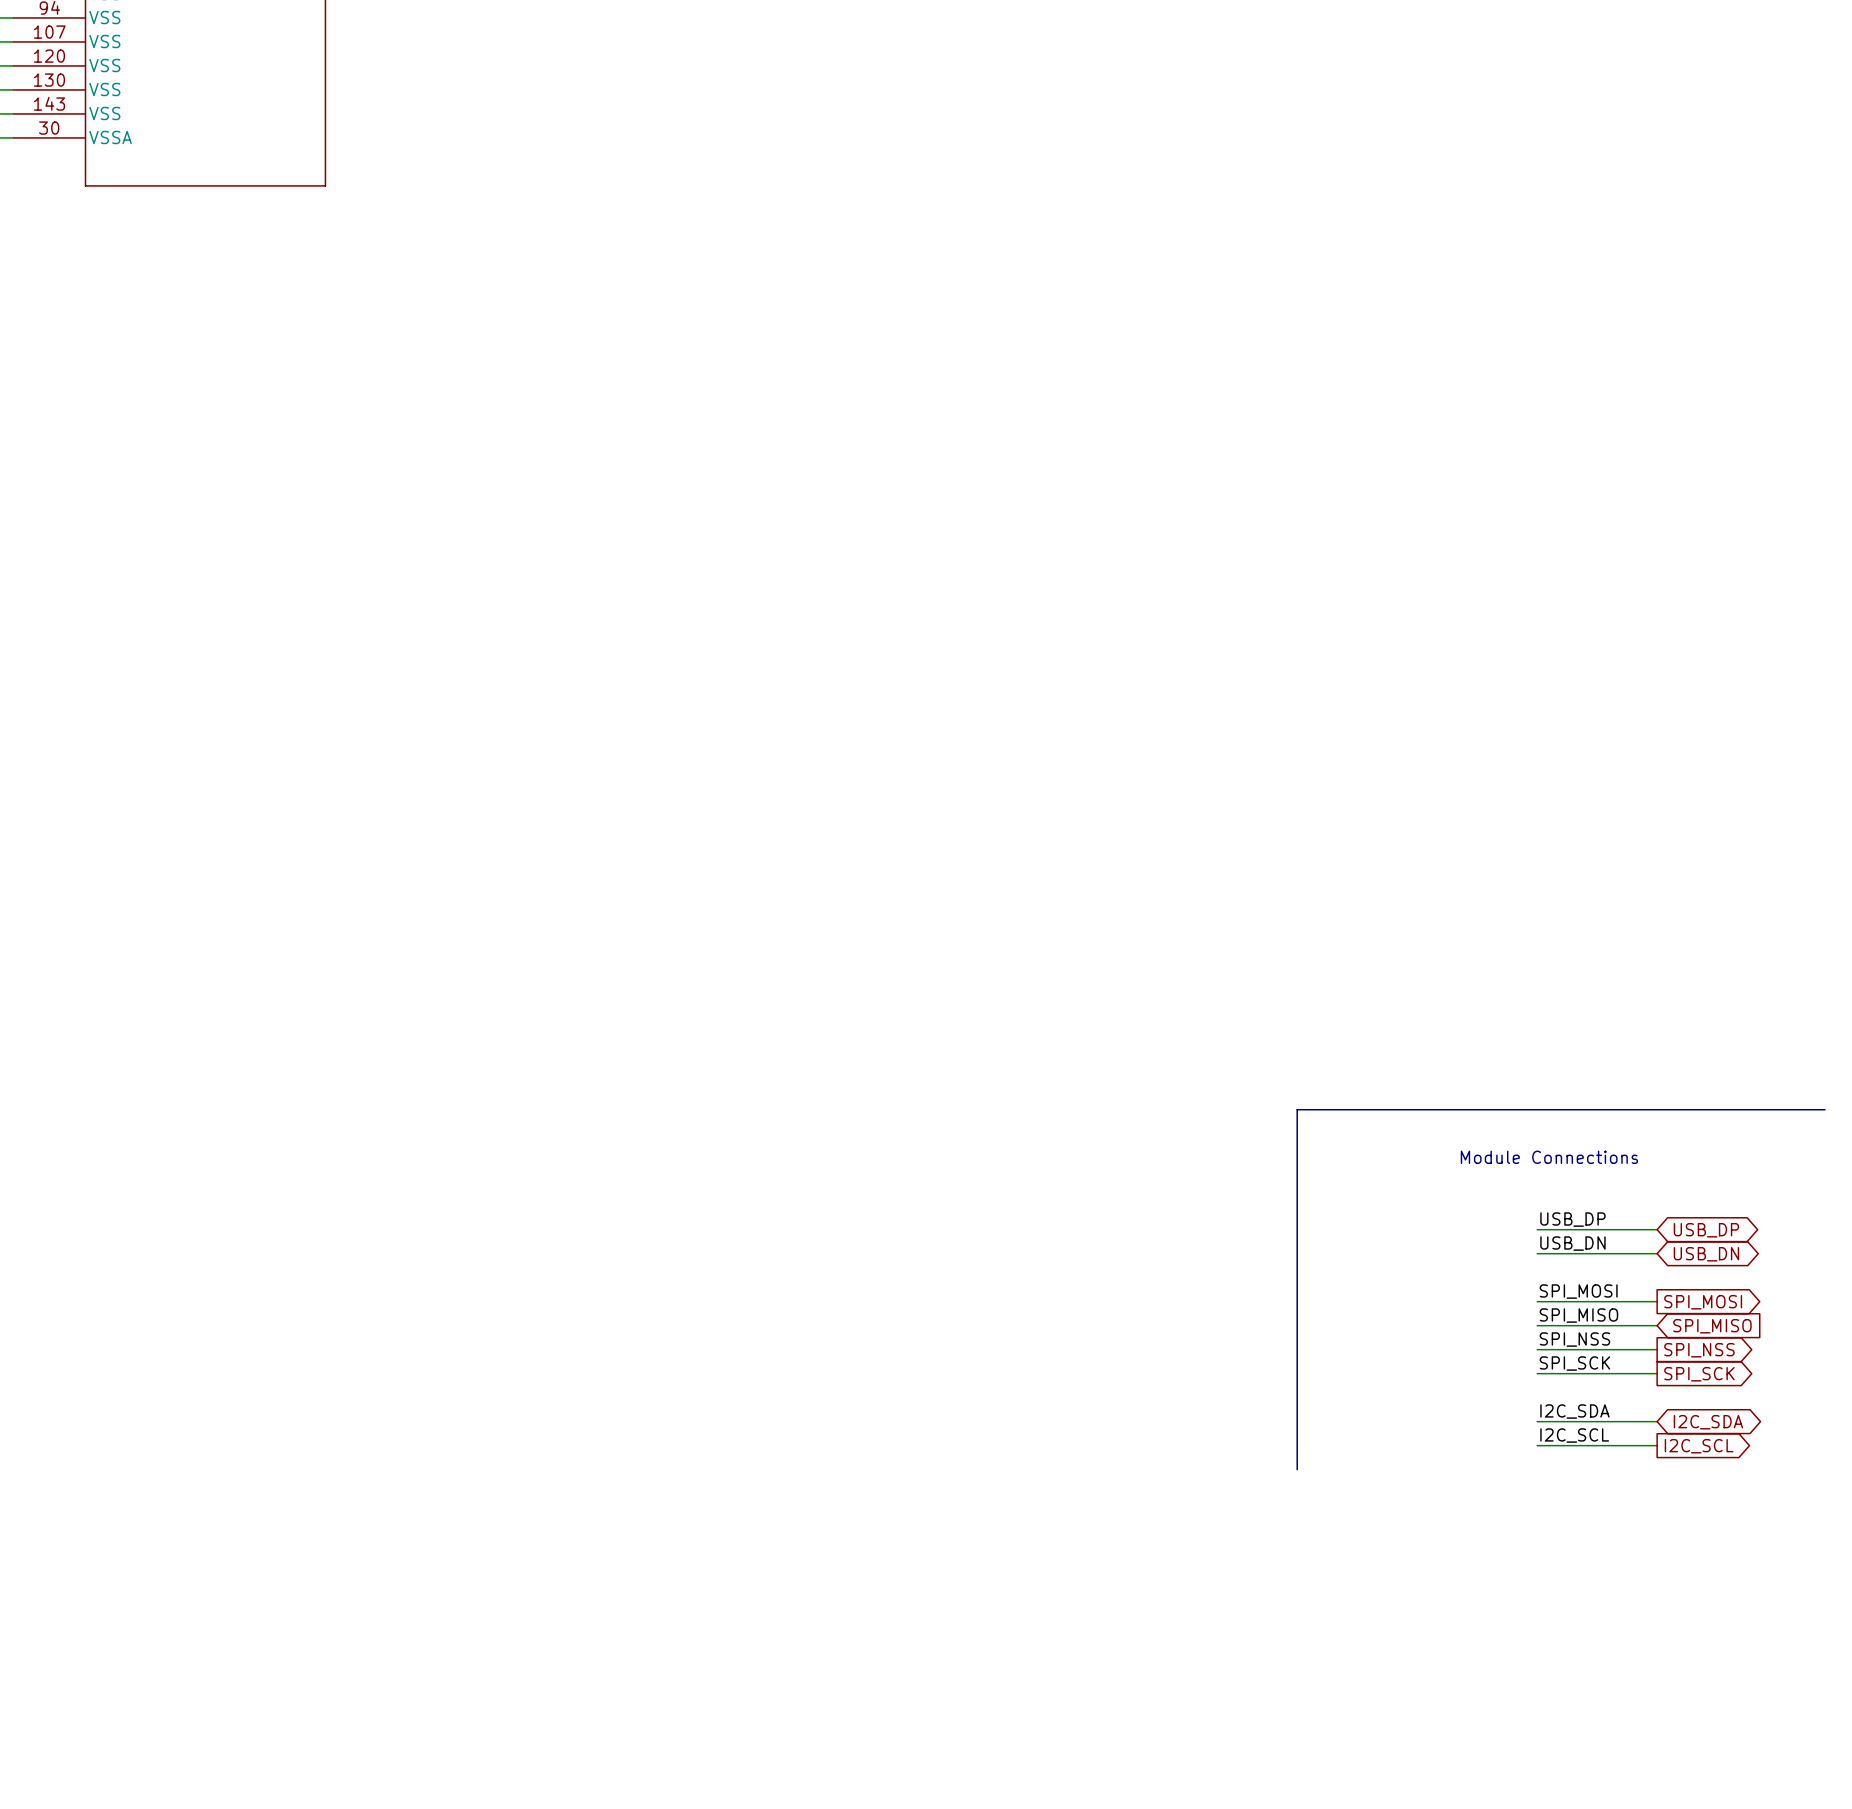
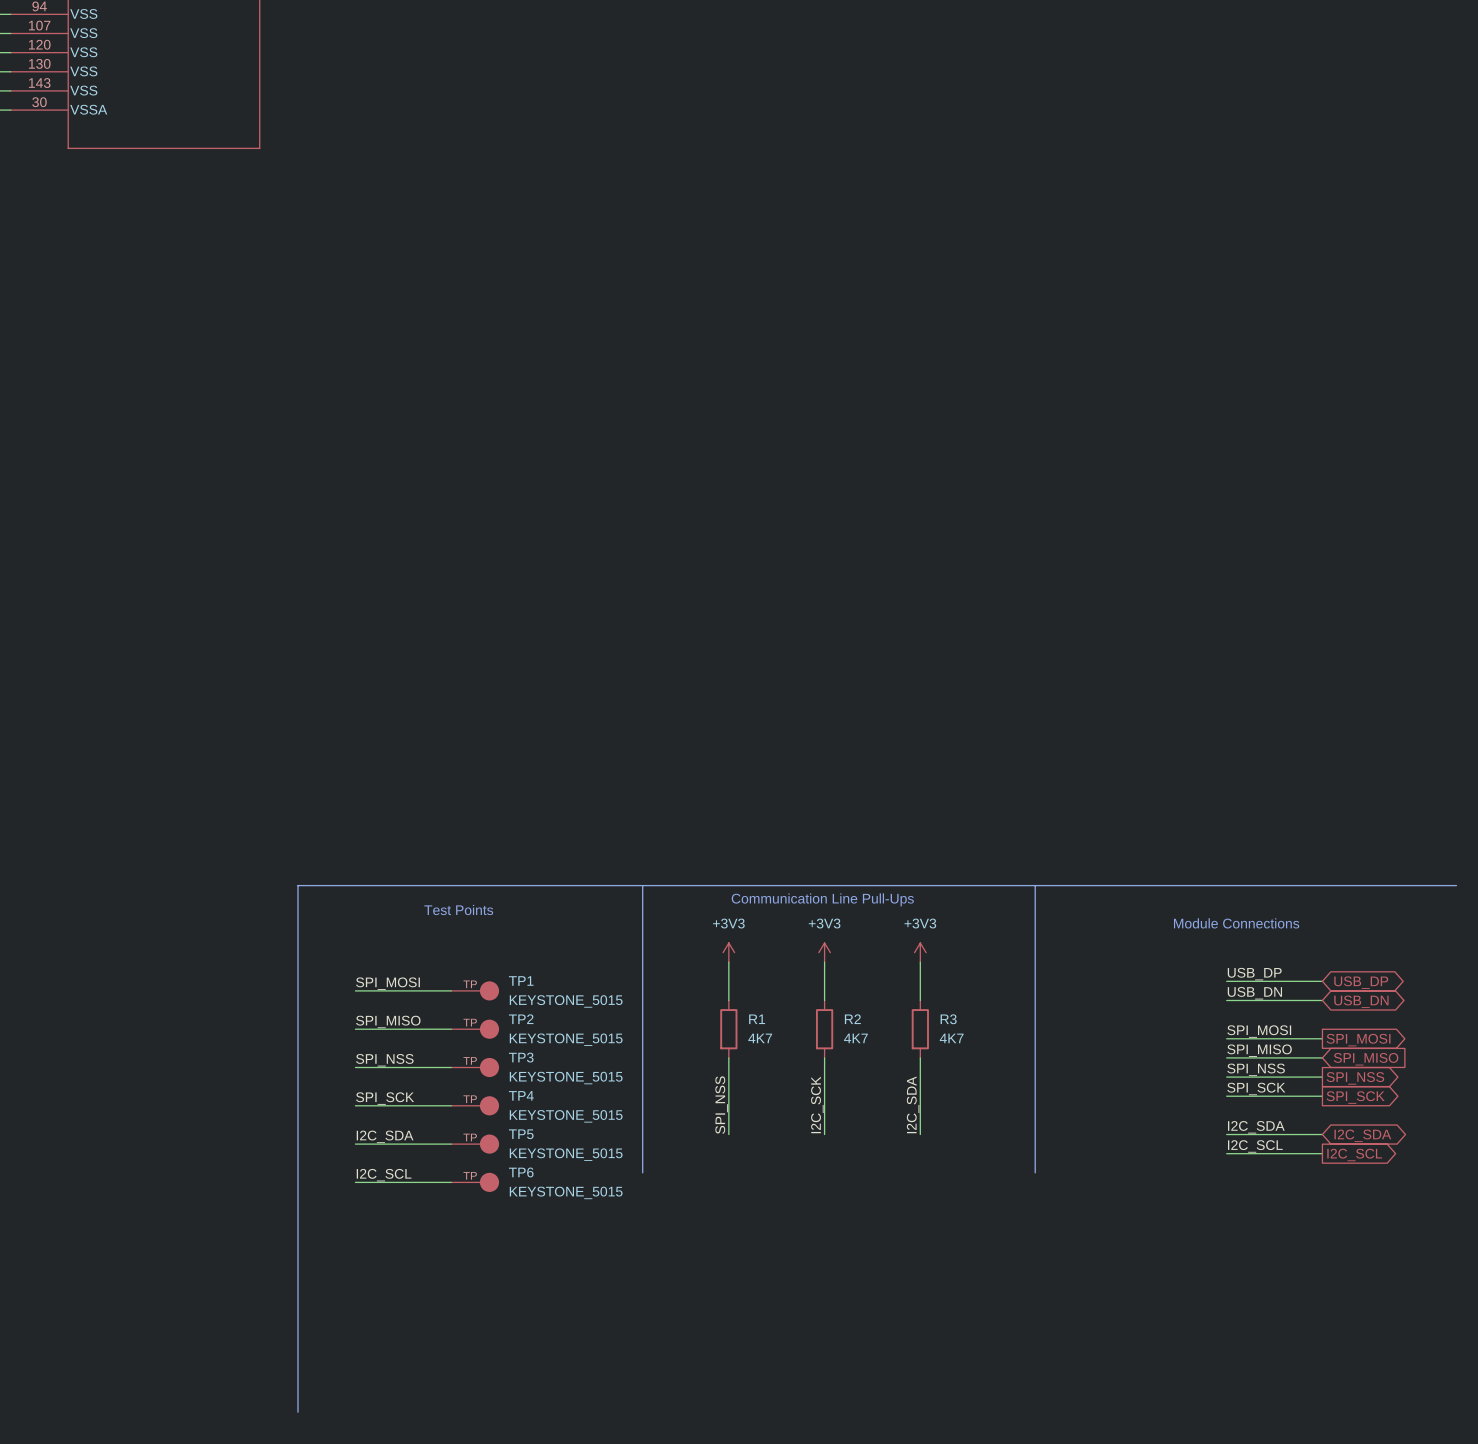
line: none -> (642, 885) (642, 1172)
line: none -> (1035, 885) (298, 885) (298, 1412)
text: none -> Communication Line Pull-Ups (822, 899)
text: none -> Test Points (458, 909)
power symbol: none -> +3V3 (728, 952)
power symbol: none -> +3V3 (824, 952)
power symbol: none -> +3V3 (920, 952)
wire: none -> (728, 962) (728, 1000)
wire: none -> (824, 962) (824, 1000)
wire: none -> (920, 962) (920, 1000)
label: none -> SPI_MOSI (387, 983)
wire: none -> (355, 990) (451, 990)
TP1: none -> KEYSTONE_5015 (475, 990)
label: none -> SPI_MISO (388, 1021)
wire: none -> (355, 1029) (451, 1029)
TP2: none -> KEYSTONE_5015 (475, 1029)
R1: none -> 4K7 (728, 1029)
R2: none -> 4K7 (824, 1029)
R3: none -> 4K7 (920, 1029)
wire: none -> (728, 1057) (728, 1134)
wire: none -> (824, 1057) (824, 1134)
wire: none -> (920, 1057) (920, 1134)
label: none -> SPI_NSS (384, 1060)
wire: none -> (355, 1067) (451, 1067)
TP3: none -> KEYSTONE_5015 (475, 1067)
label: none -> SPI_SCK (385, 1098)
label: none -> SPI_NSS (721, 1105)
label: none -> I2C_SCK (817, 1104)
label: none -> I2C_SDA (913, 1104)
wire: none -> (355, 1105) (451, 1105)
TP4: none -> KEYSTONE_5015 (475, 1105)
label: none -> I2C_SDA (385, 1136)
wire: none -> (355, 1144) (451, 1144)
TP5: none -> KEYSTONE_5015 (475, 1144)
label: none -> I2C_SCL (384, 1175)
wire: none -> (355, 1182) (451, 1182)
TP6: none -> KEYSTONE_5015 (475, 1182)

